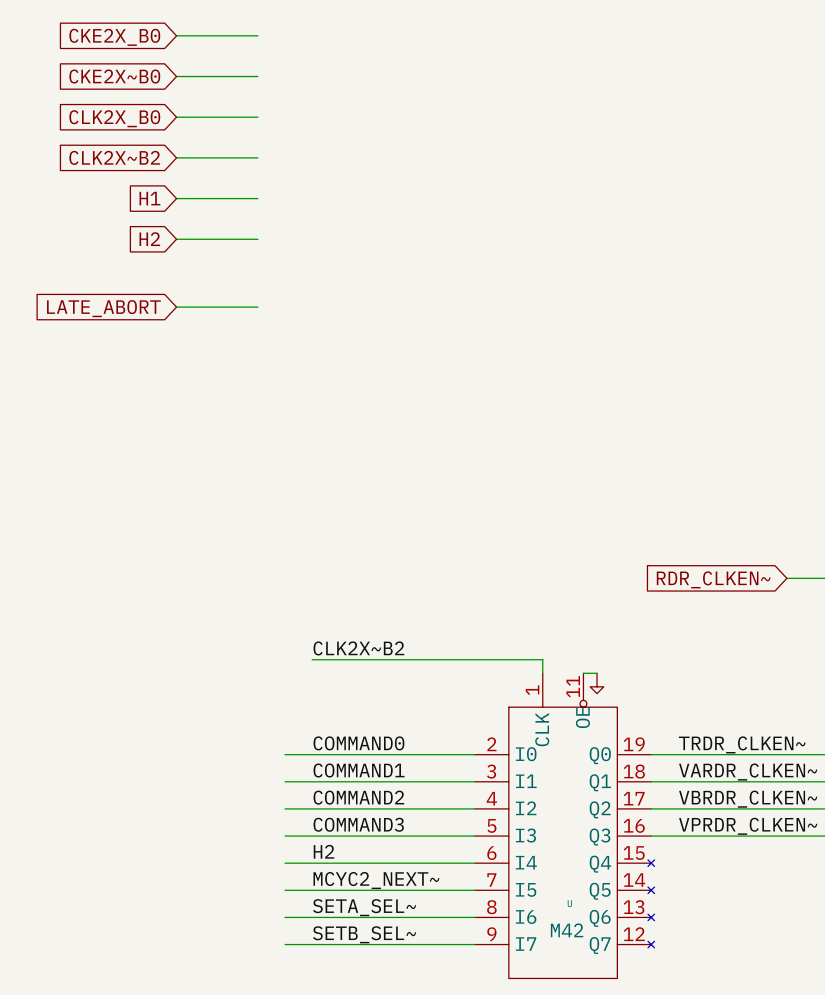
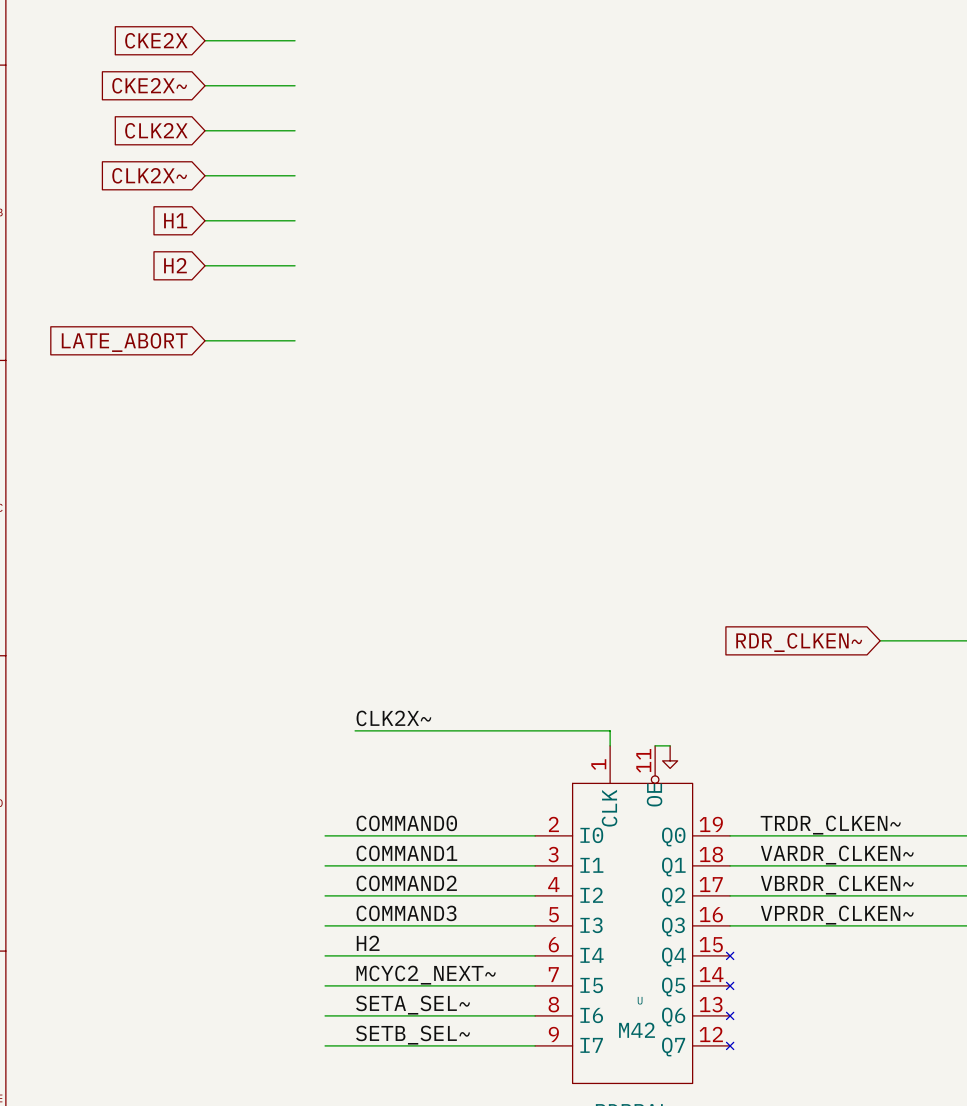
global label: CKE2X_B0 (114, 37) -> CKE2X (156, 40)
global label: CKE2X~B0 (114, 76) -> CKE2X~ (149, 85)
global label: CLK2X_B0 (114, 118) -> CLK2X (156, 130)
global label: CLK2X~B2 (114, 157) -> CLK2X~ (149, 175)
label: CLK2X~B2 (358, 648) -> CLK2X~ (393, 718)

